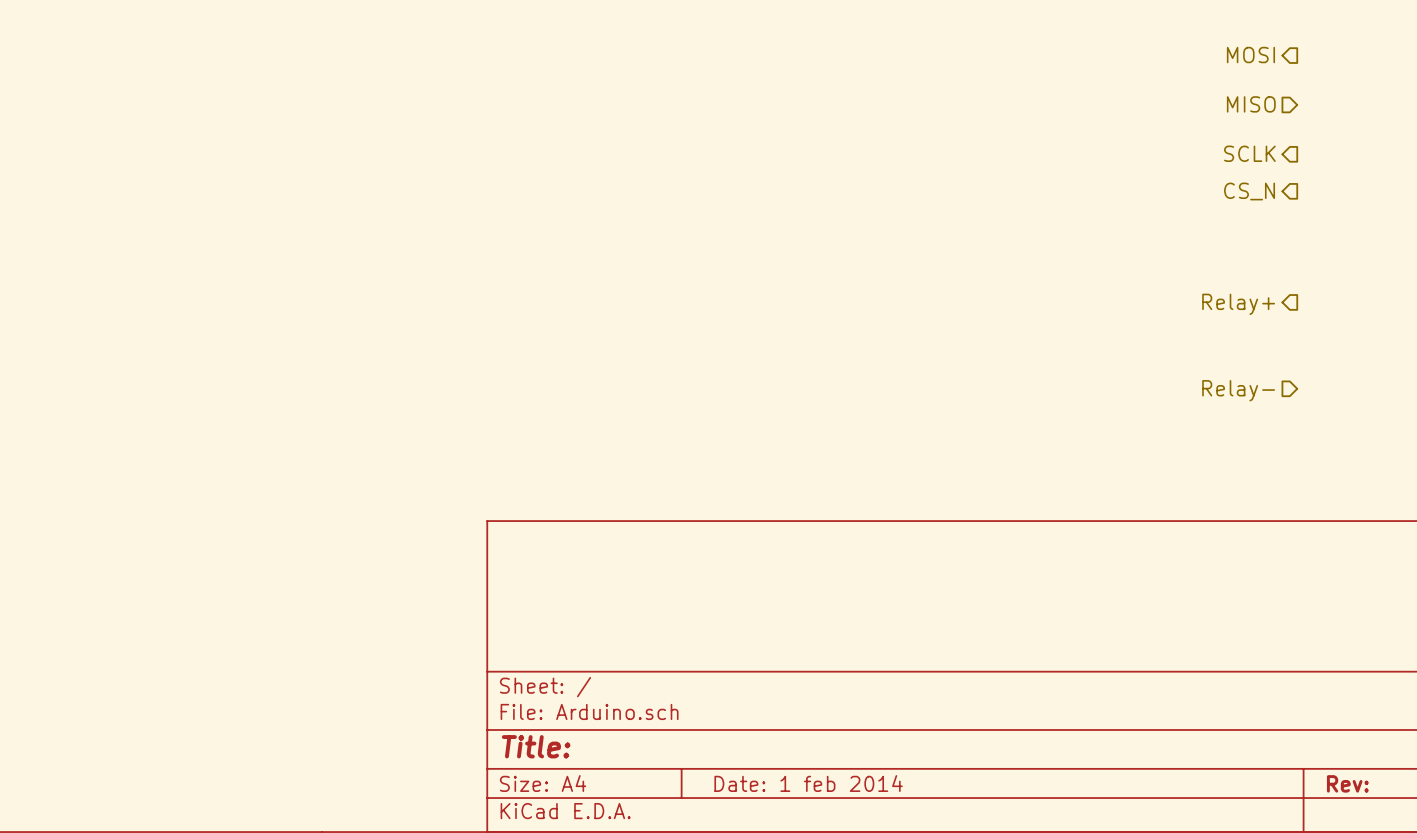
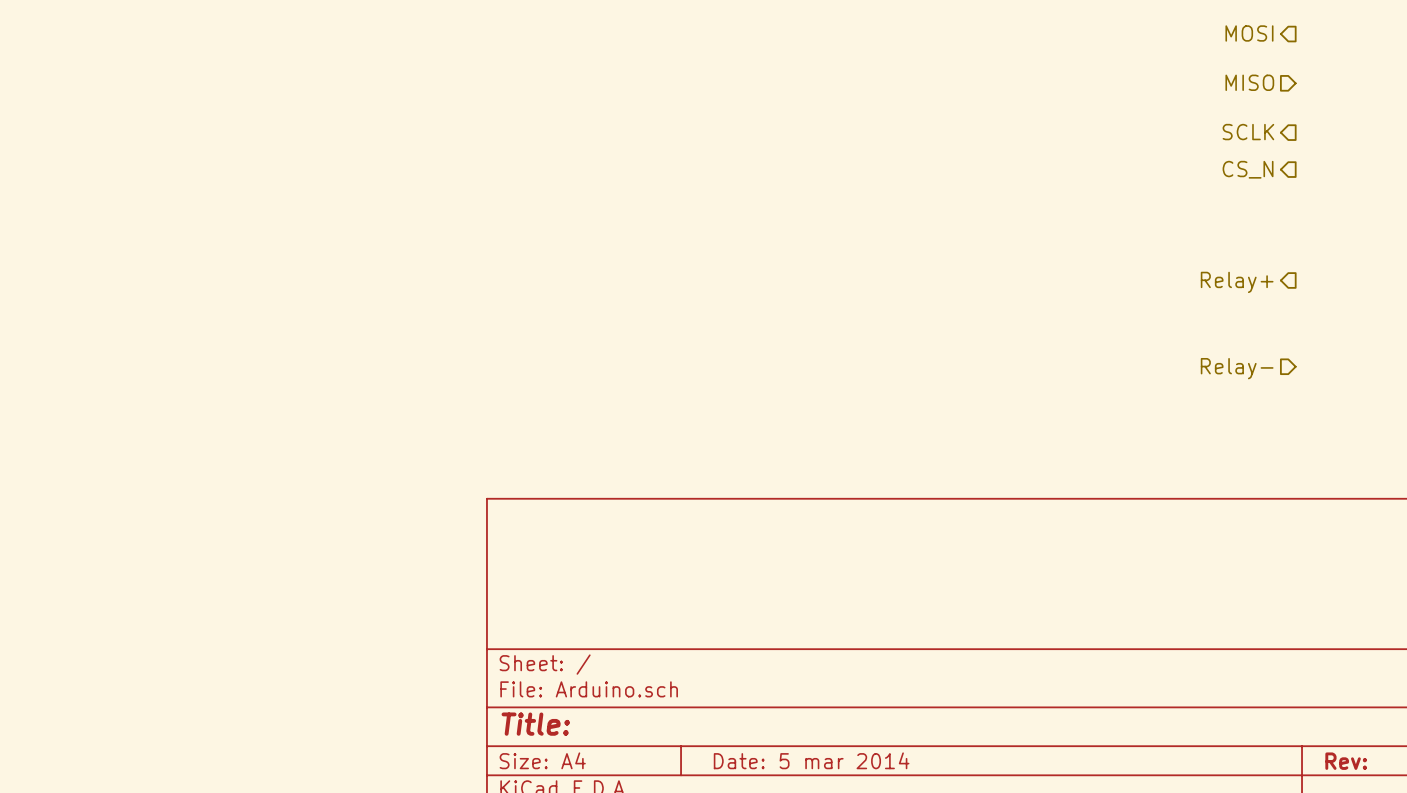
title block: Date: 1 feb 2014 (808, 783) -> Date: 5 mar 2014 (811, 760)

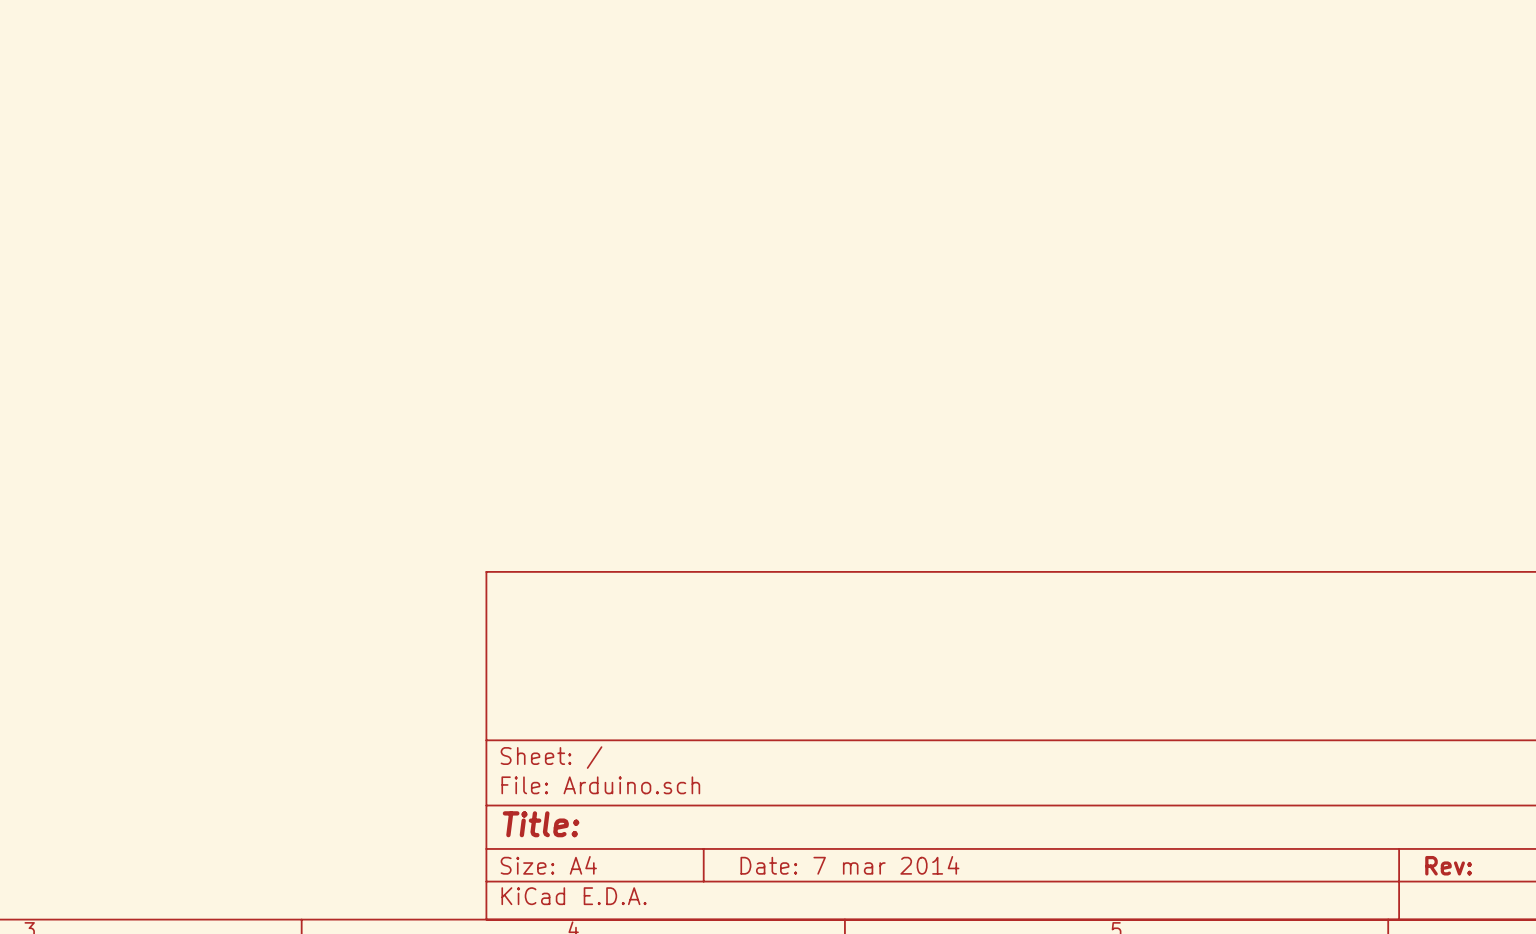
hierarchical label: MOSI (1249, 33) -> none
hierarchical label: MISO (1249, 82) -> none
hierarchical label: SCLK (1248, 132) -> none
hierarchical label: CS_N (1248, 169) -> none
hierarchical label: Relay+ (1237, 282) -> none
hierarchical label: Relay- (1237, 368) -> none
title block: Date: 5 mar 2014 (811, 760) -> Date: 7 mar 2014 (849, 865)

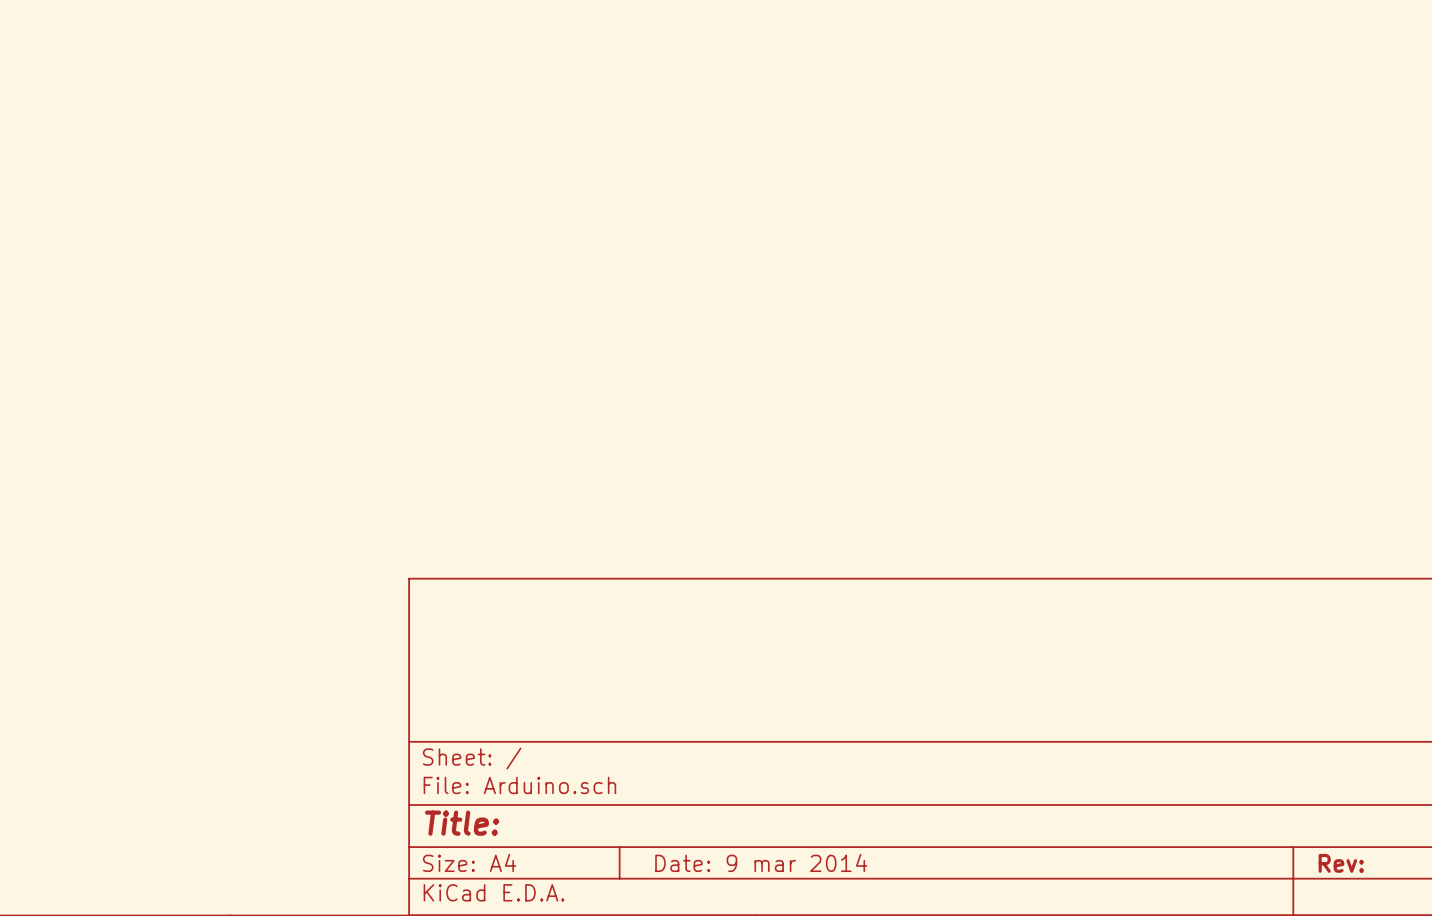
title block: Date: 7 mar 2014 (849, 865) -> Date: 9 mar 2014 (761, 862)

